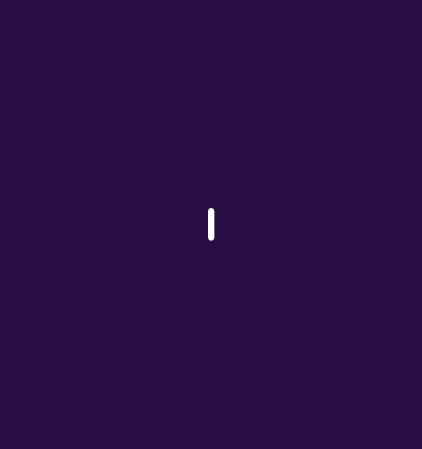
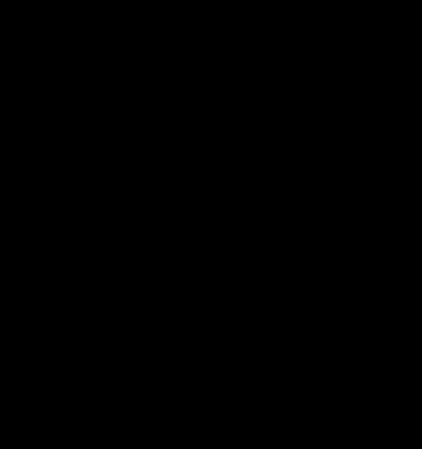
line: (211, 211) (211, 237) -> none

